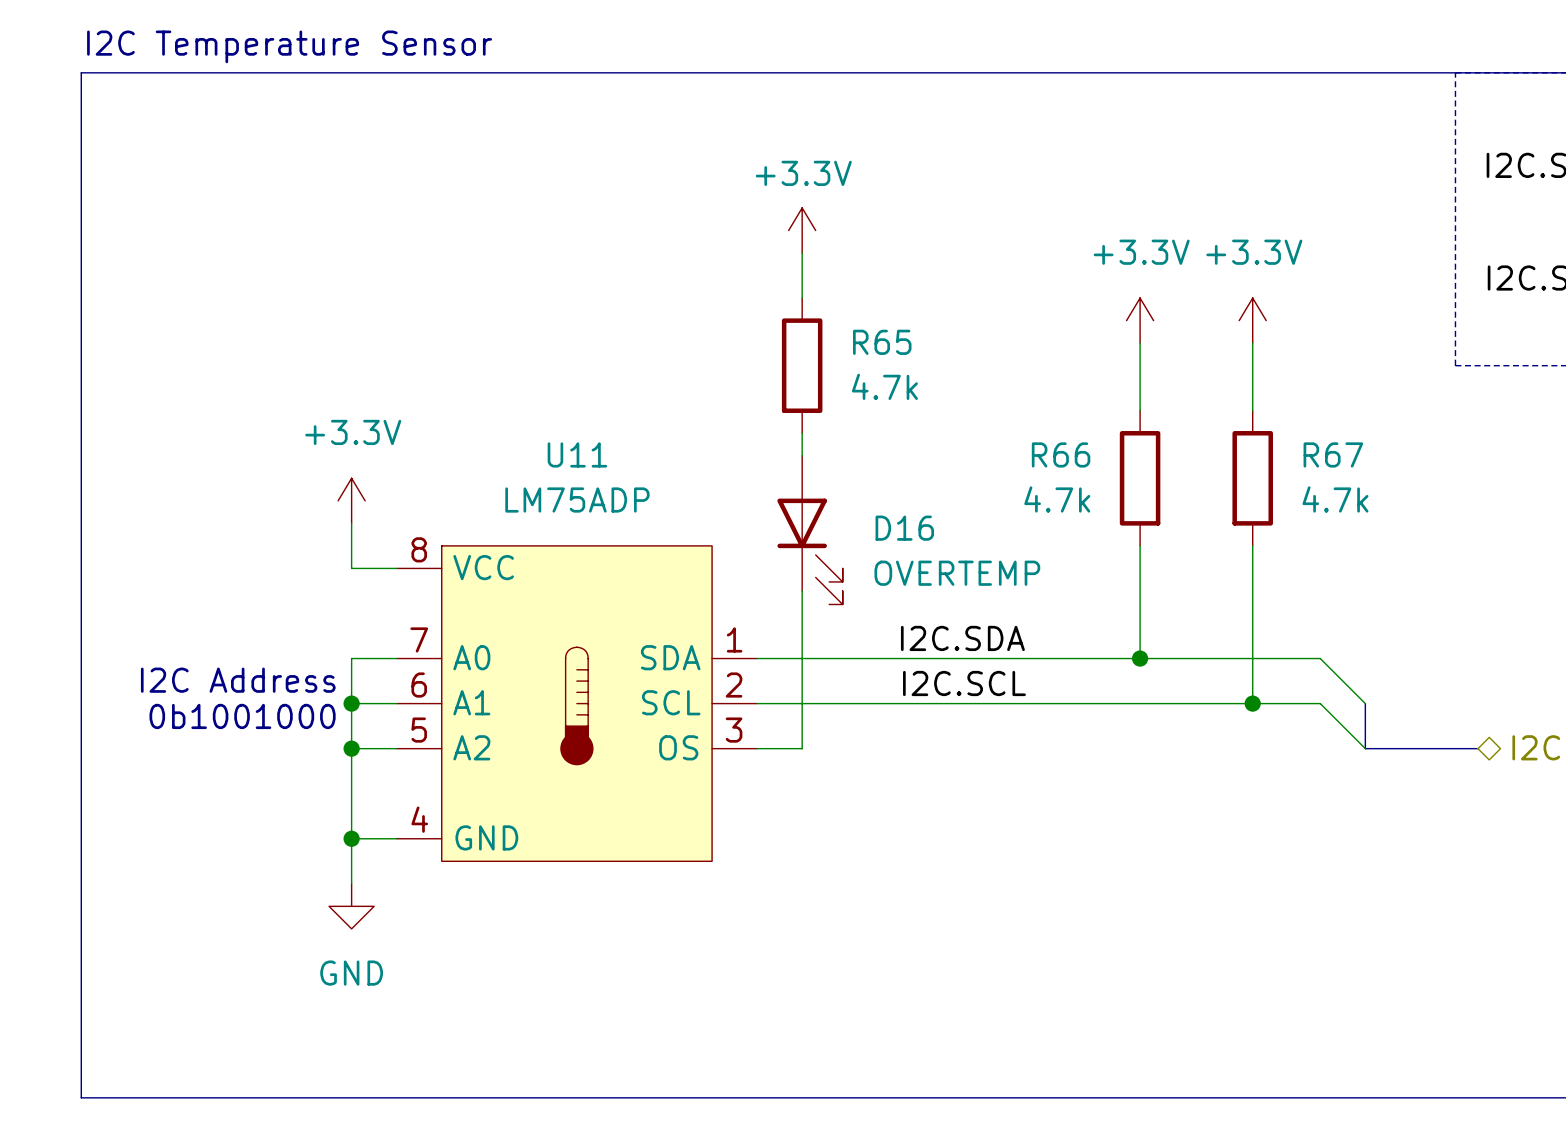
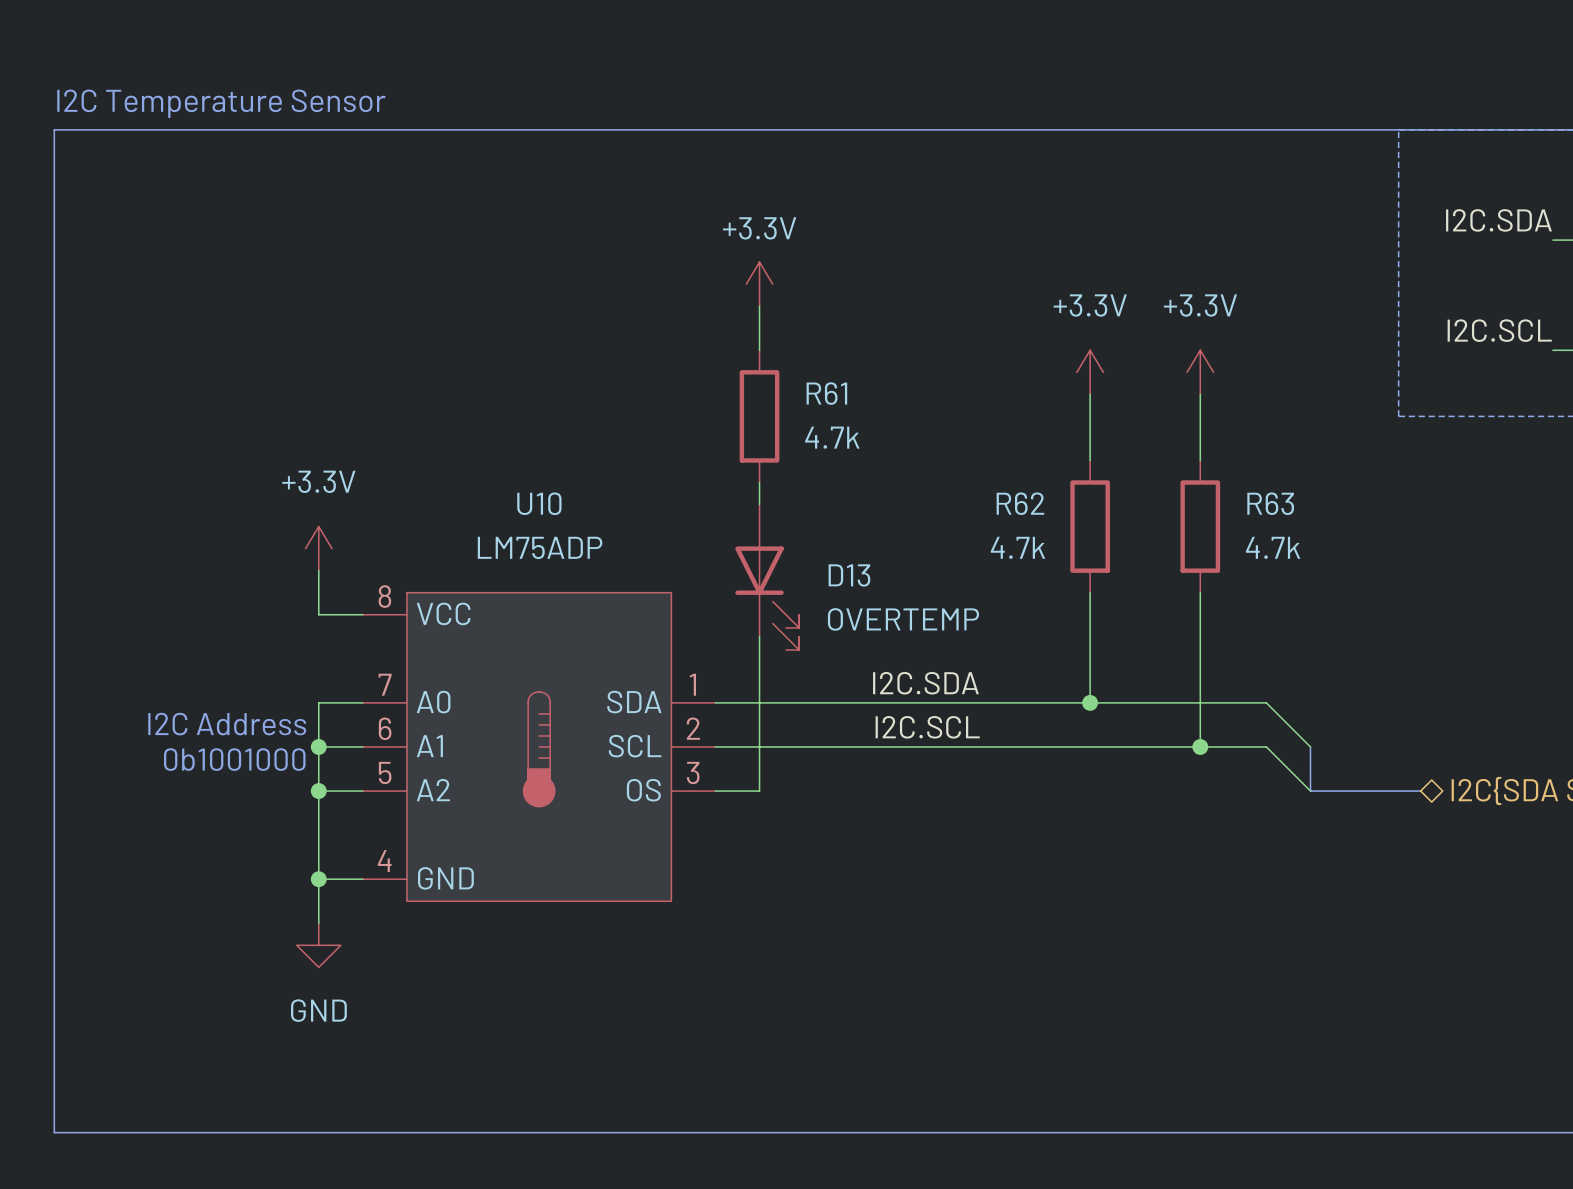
R65 name: R65 (882, 342) -> R61 (826, 393)
U11 name: U11 (577, 454) -> U10 (539, 503)
R66 name: R66 (1061, 454) -> R62 (1020, 503)
R67 name: R67 (1333, 454) -> R63 (1270, 503)
D16 name: D16 (904, 528) -> D13 (849, 575)

